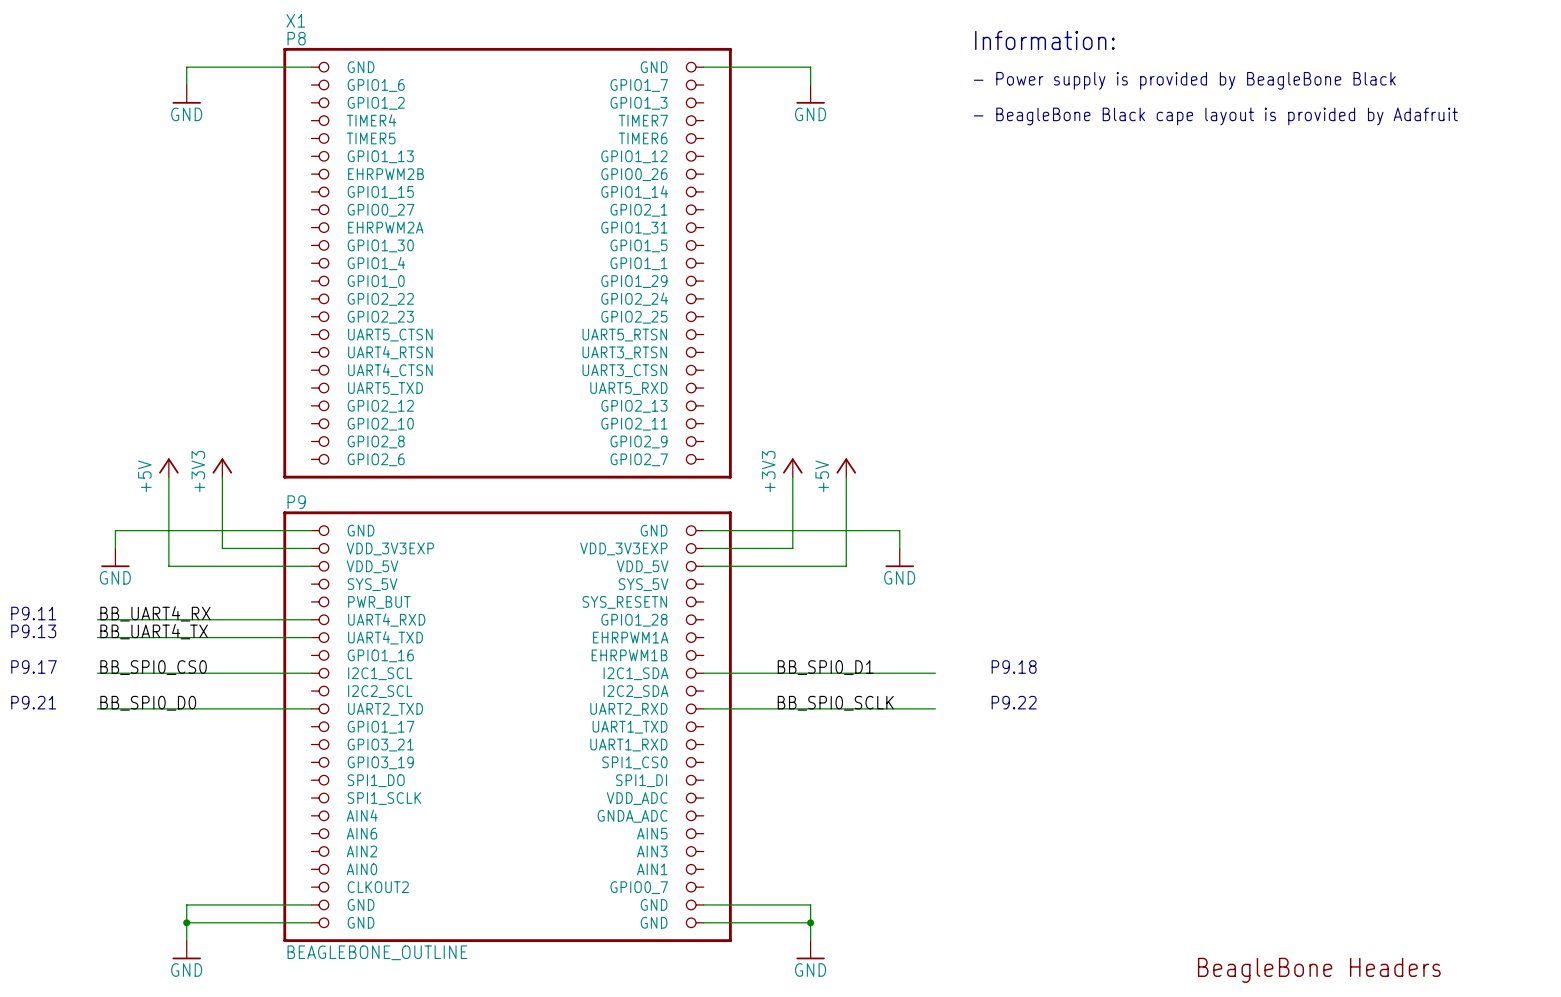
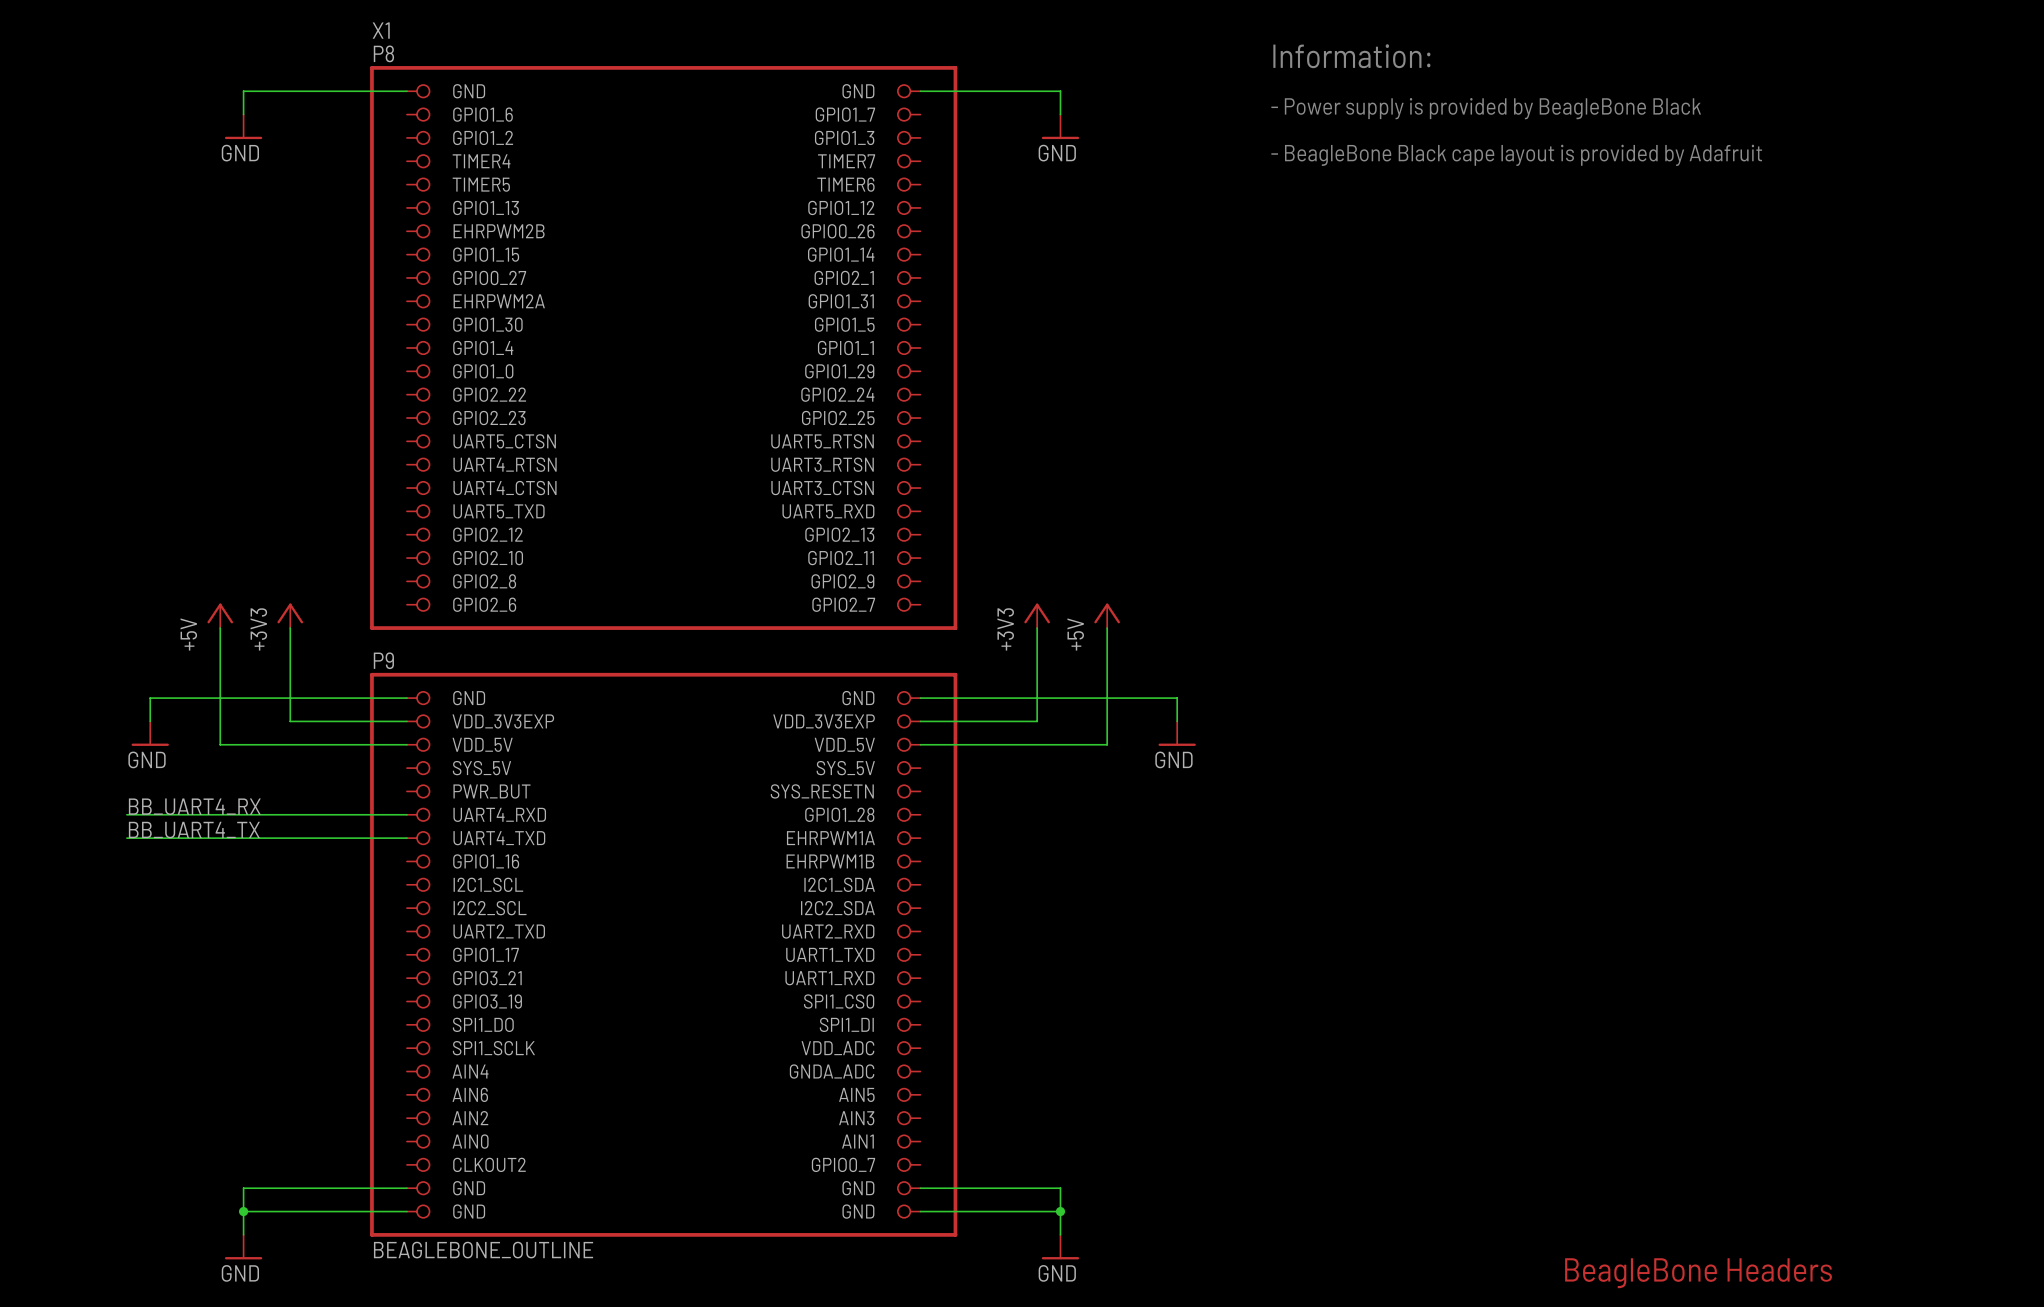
text: P9.11 (33, 613) -> none
text: P9.13 (33, 631) -> none
text: P9.17 (33, 667) -> none
label: BB_SPI0_CS0 (153, 667) -> none
label: BB_SPI0_D1 (825, 667) -> none
text: P9.18 (1014, 667) -> none
wire: (97, 673) (311, 673) -> none
wire: (703, 673) (935, 673) -> none
text: P9.21 (33, 702) -> none
text: P9.22 (1014, 702) -> none
label: BB_SPI0_D0 (148, 703) -> none
label: BB_SPI0_SCLK (835, 703) -> none
wire: (97, 708) (311, 708) -> none
wire: (703, 708) (935, 708) -> none

